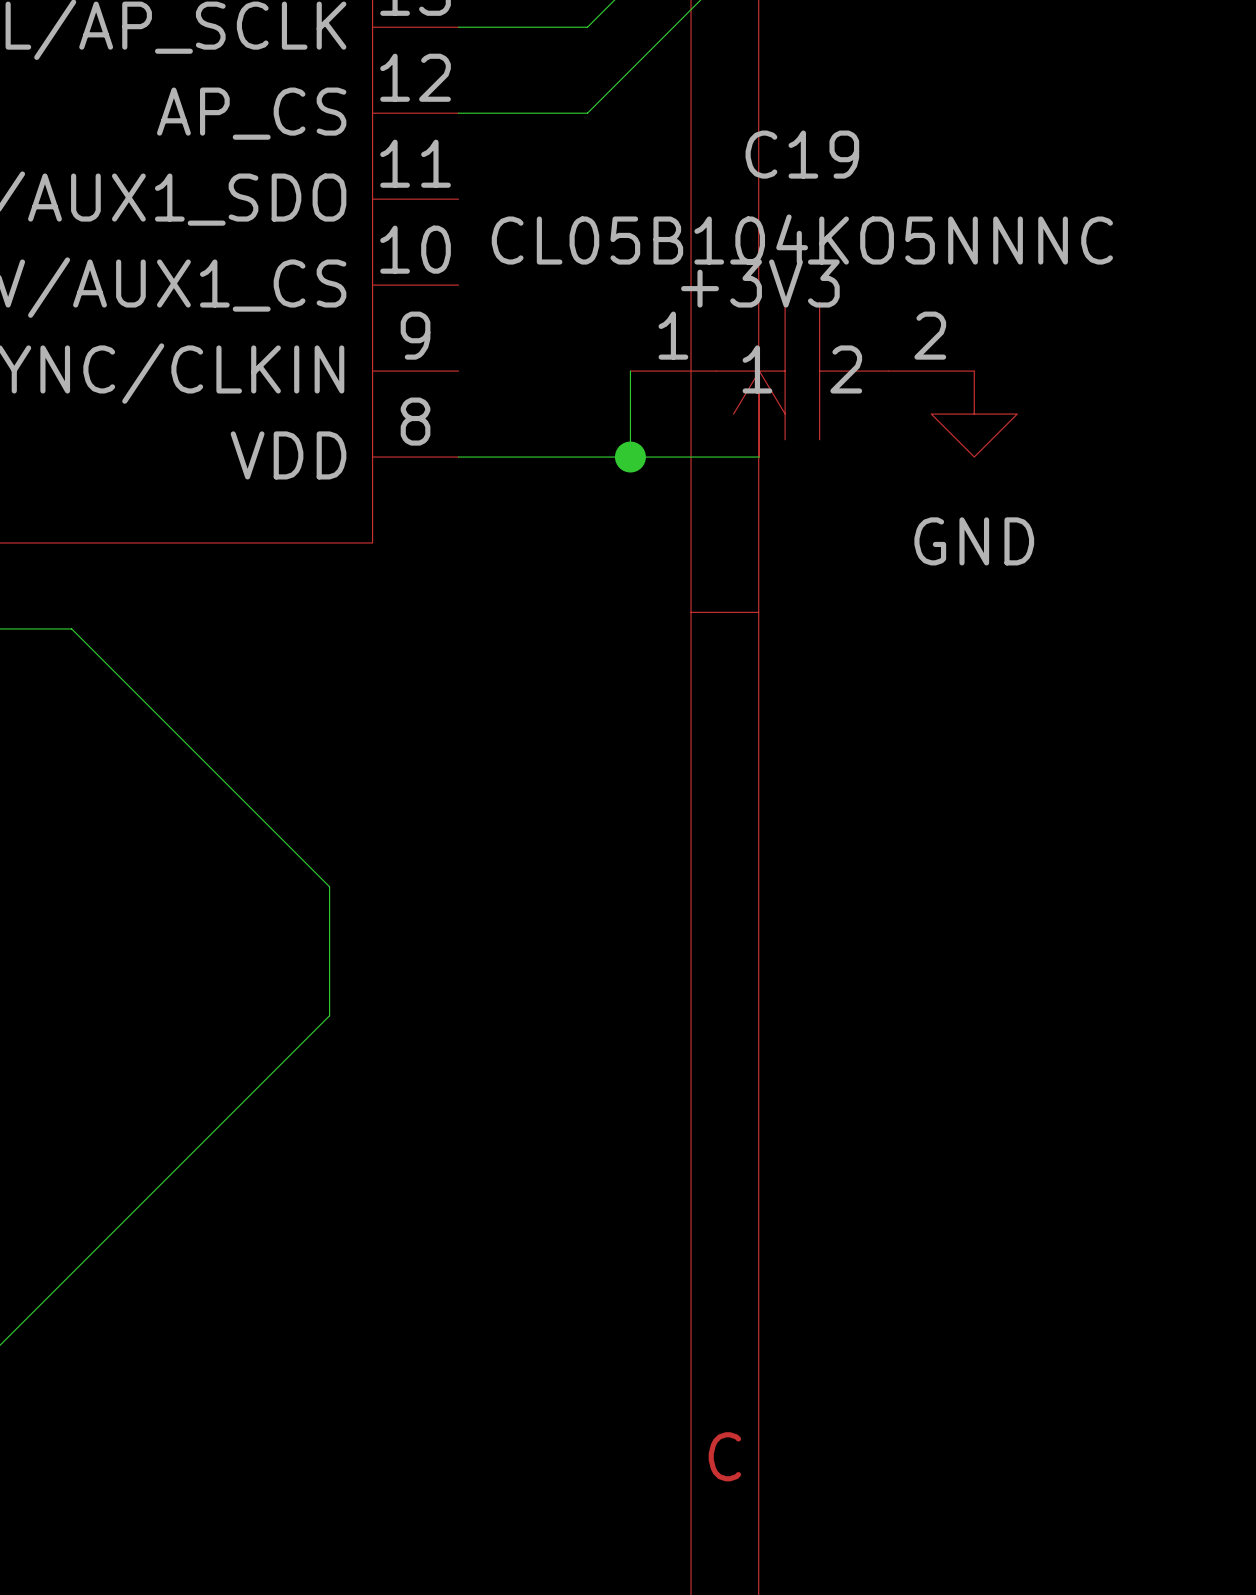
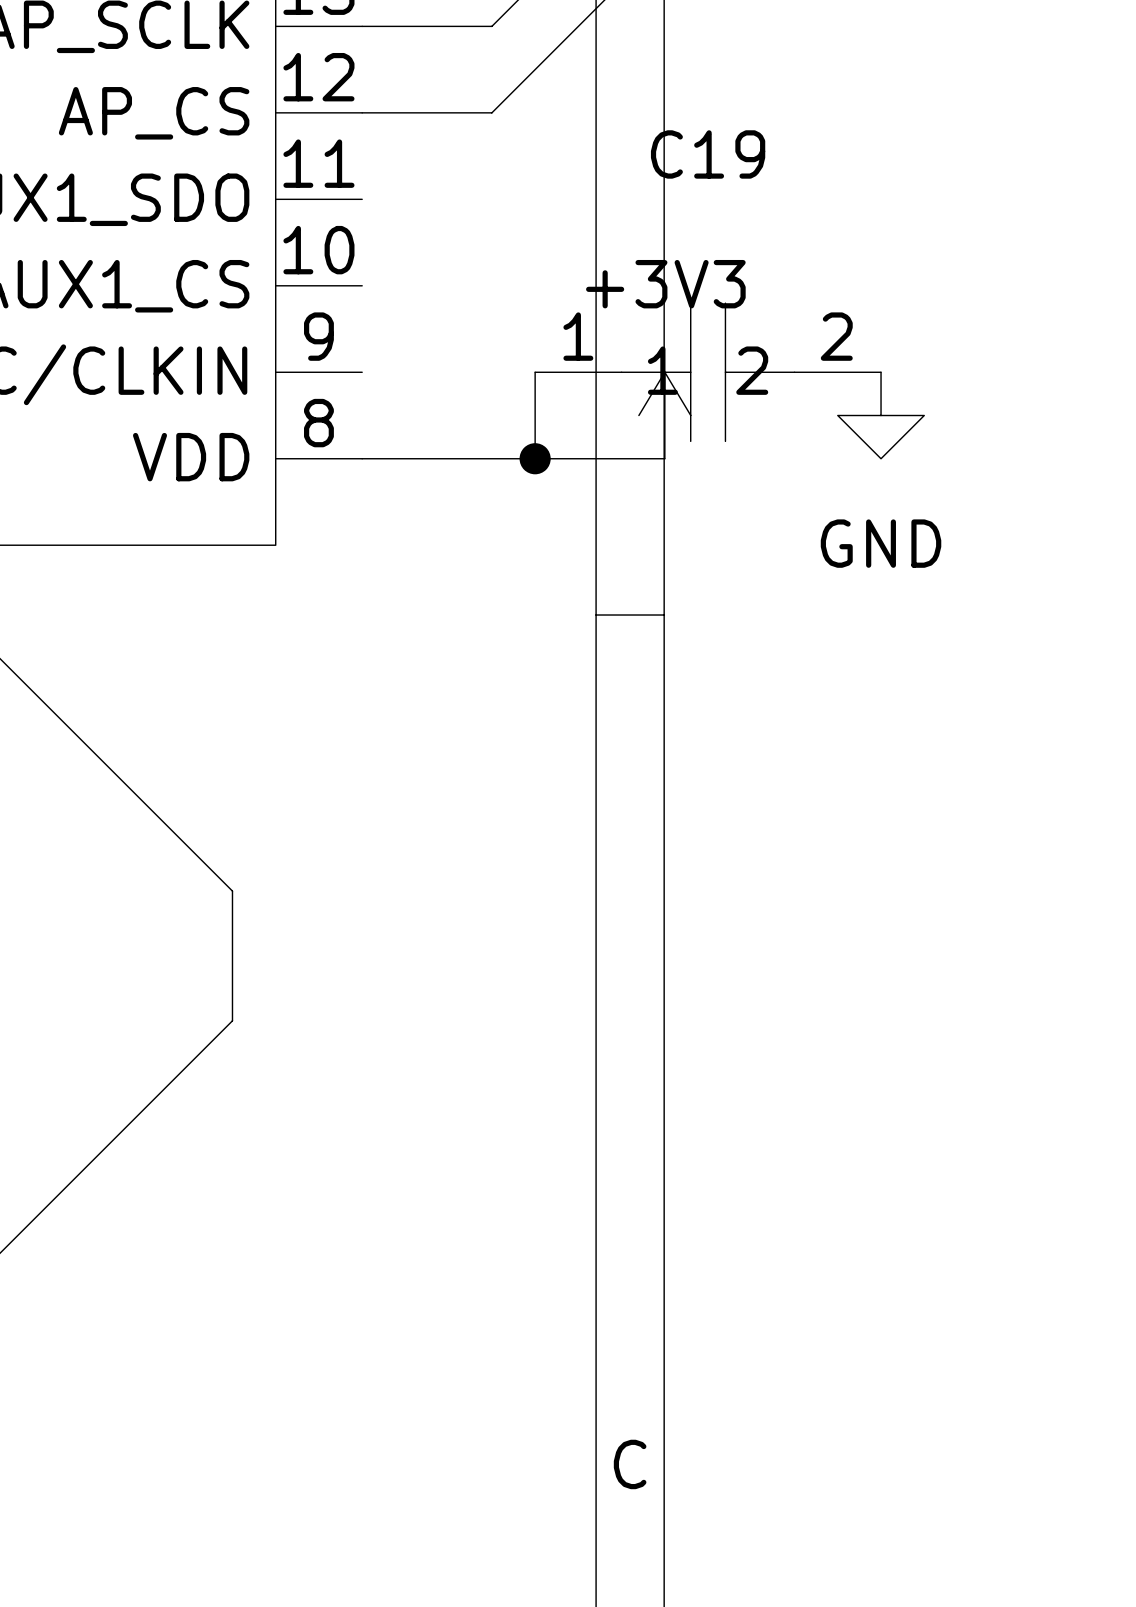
C19 value: CL05B104KO5NNNC (802, 239) -> none

